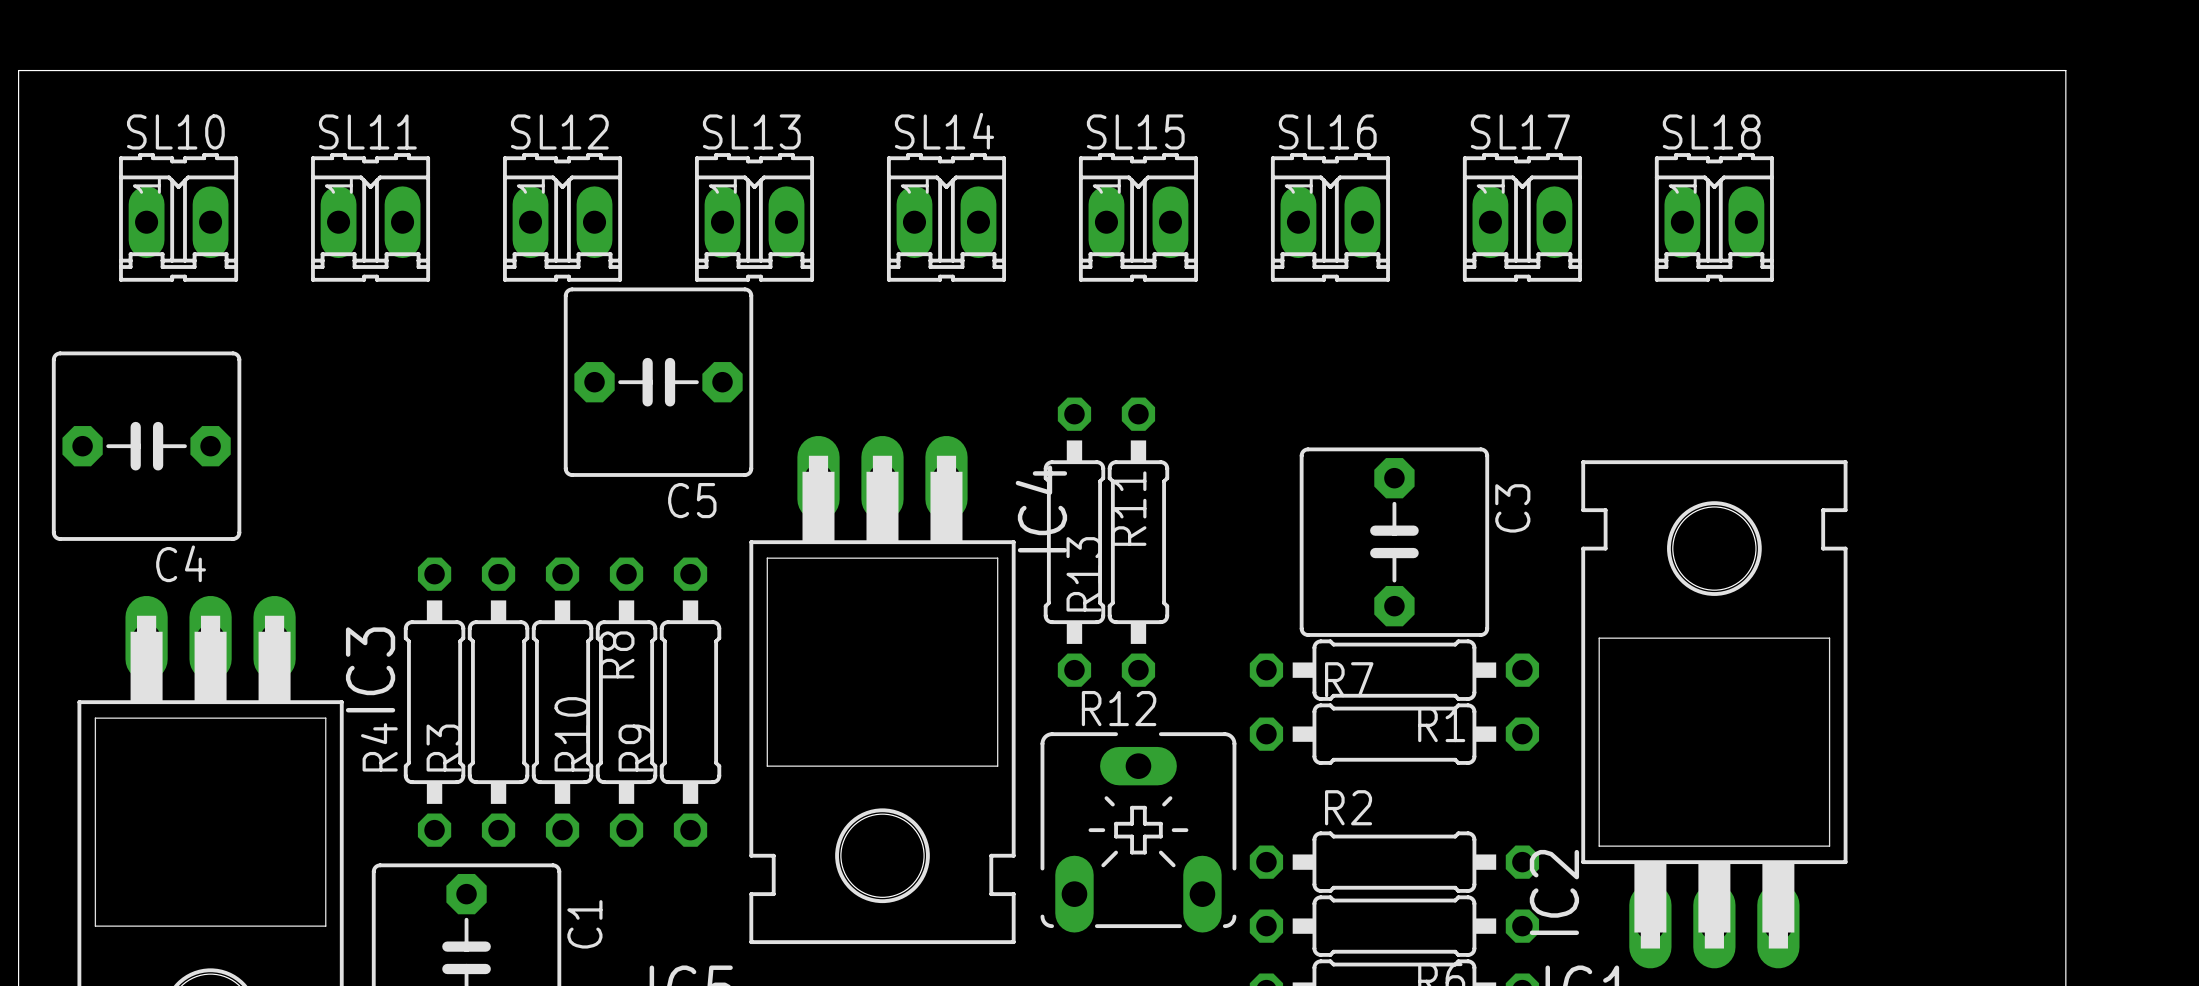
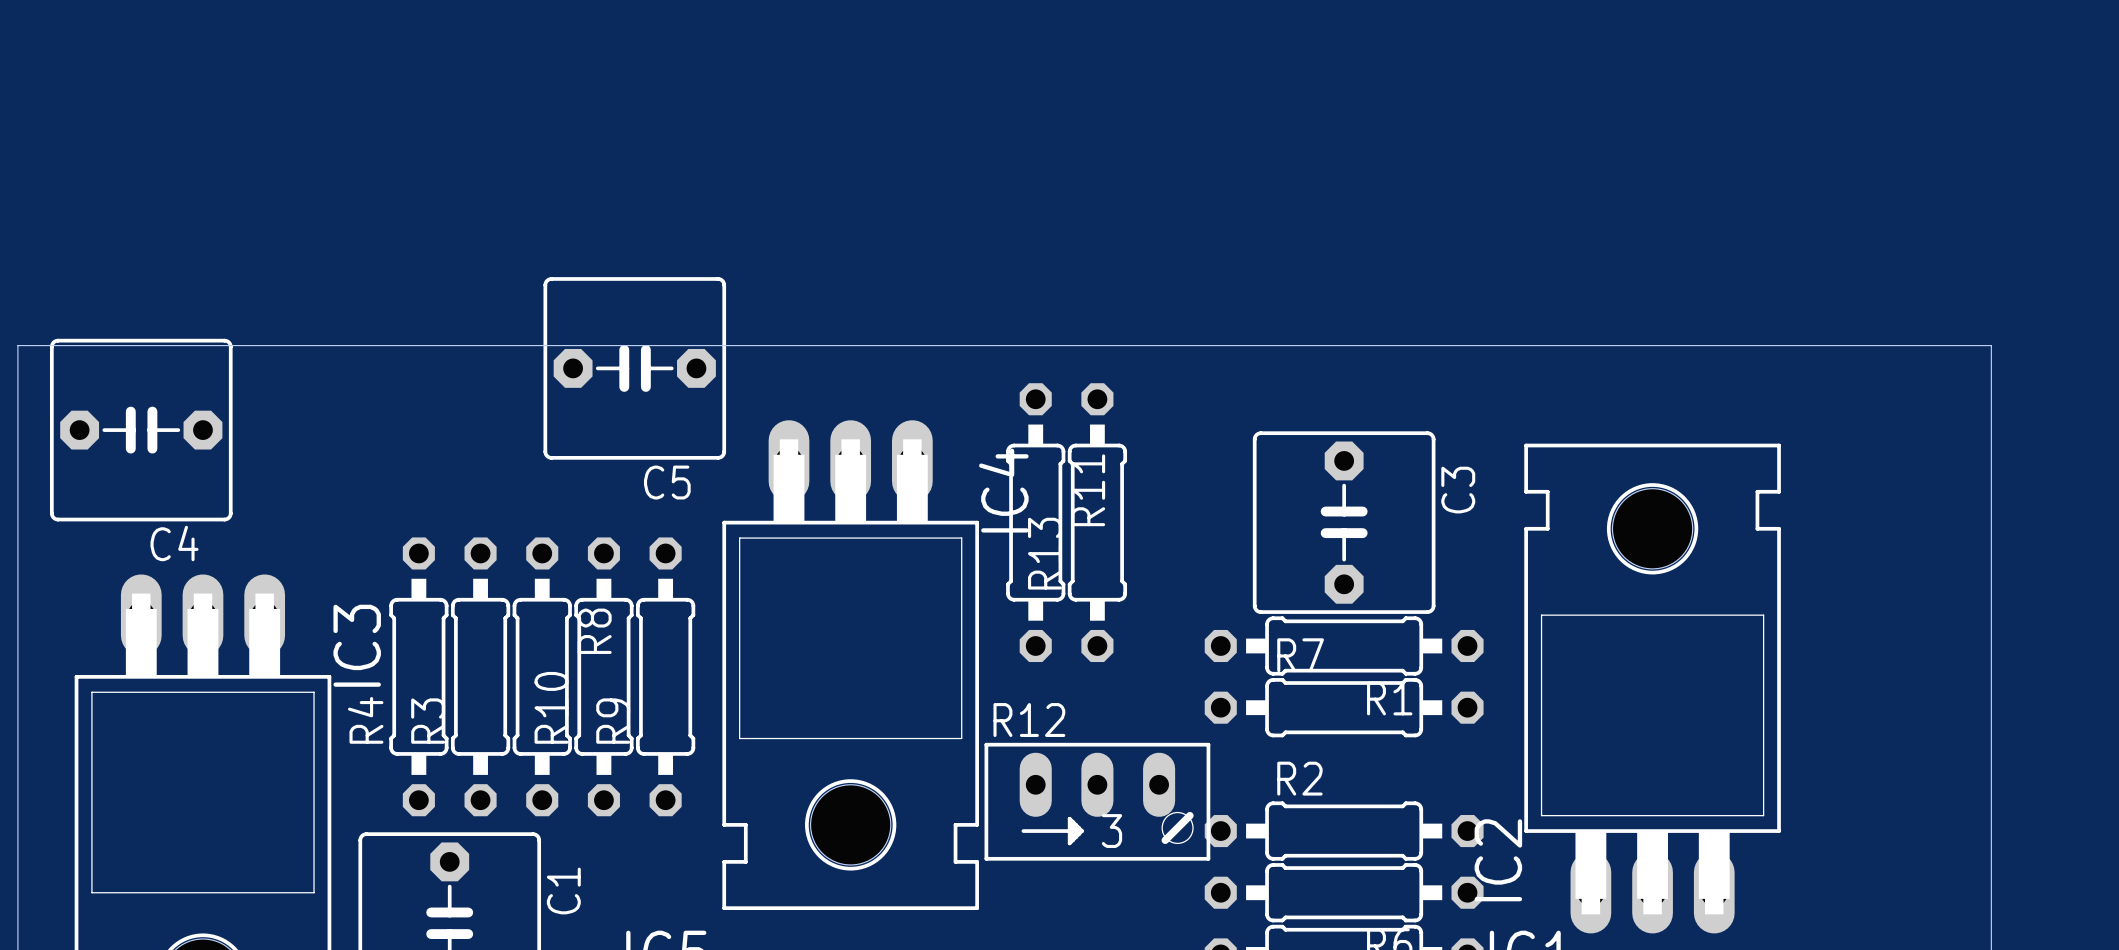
SL10: (178, 217) -> none
SL11: (370, 217) -> none
SL12: (562, 217) -> none
SL13: (754, 217) -> none
SL14: (946, 217) -> none
SL15: (1138, 217) -> none
SL16: (1330, 217) -> none
SL17: (1522, 217) -> none
SL18: (1714, 217) -> none
board edge: (18, 358) (18, 70) (2065, 70) (2065, 358) -> (17, 345) (1991, 345)
R12 name position: R12 (1119, 708) -> R12 (1029, 720)
R12 footprint: [1040, 732, 1237, 933] -> [984, 742, 1211, 861]

